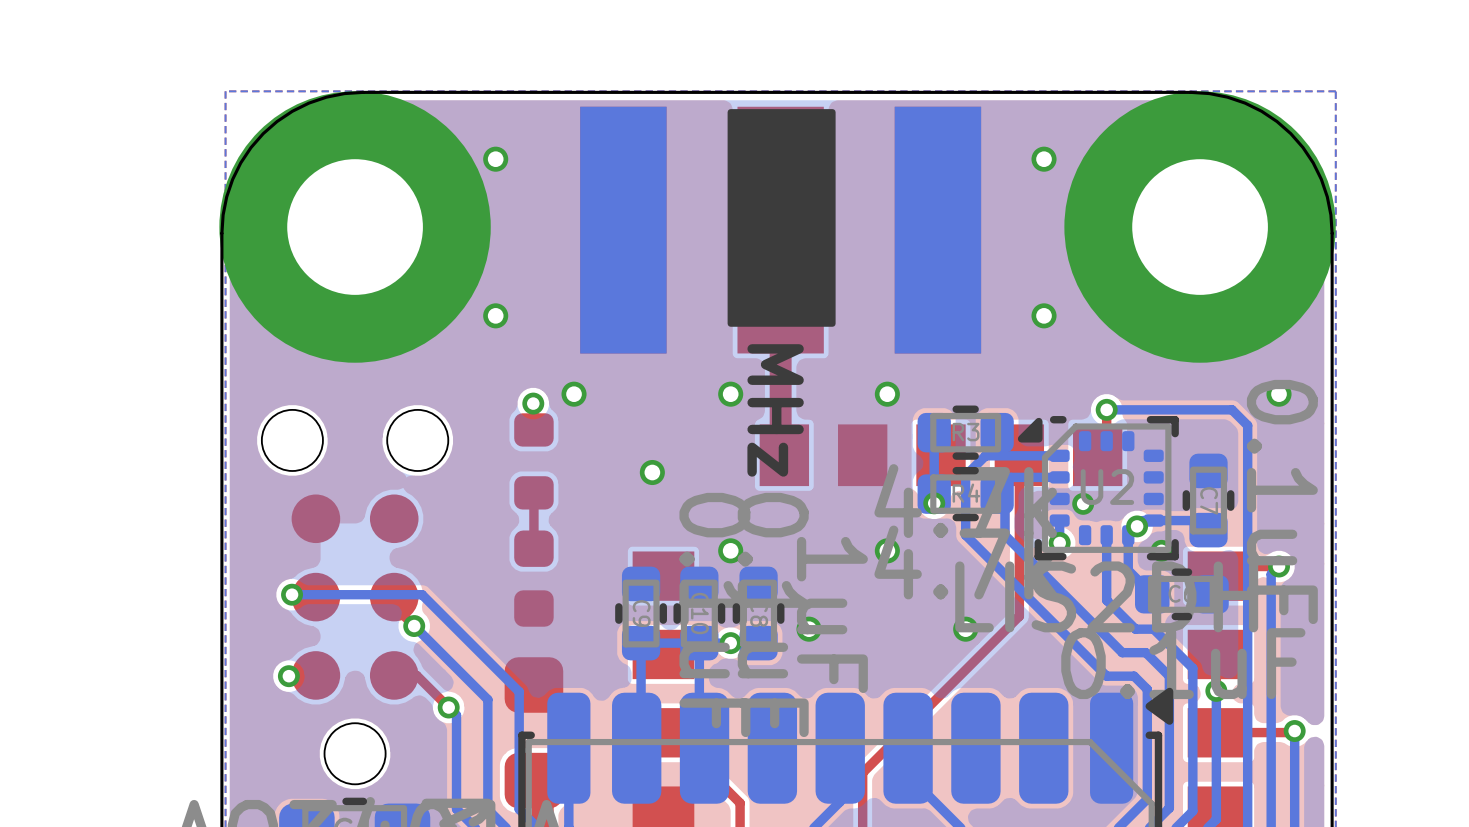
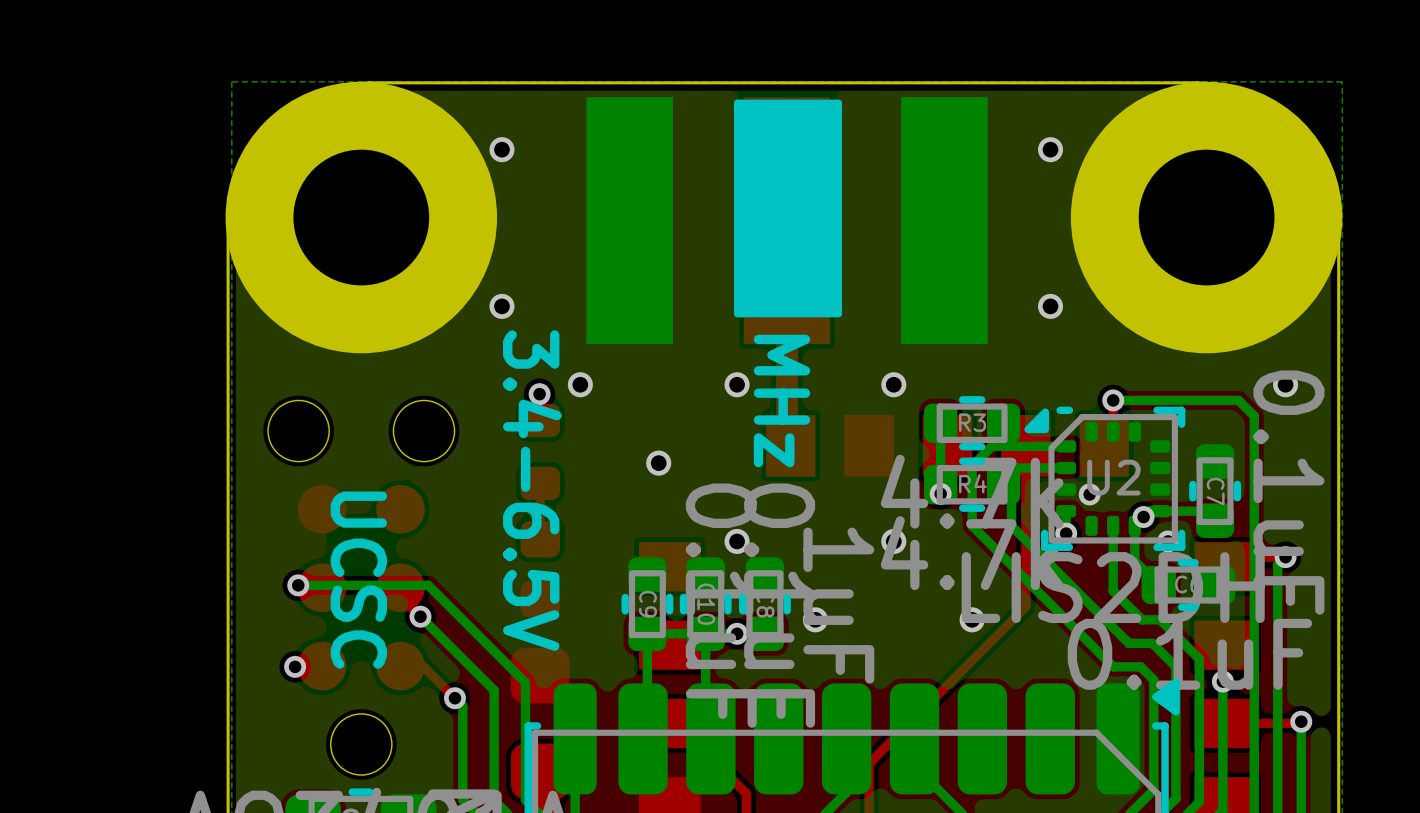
text: none -> 3.4-6.5V (532, 490)
text: none -> UCSC (358, 580)

